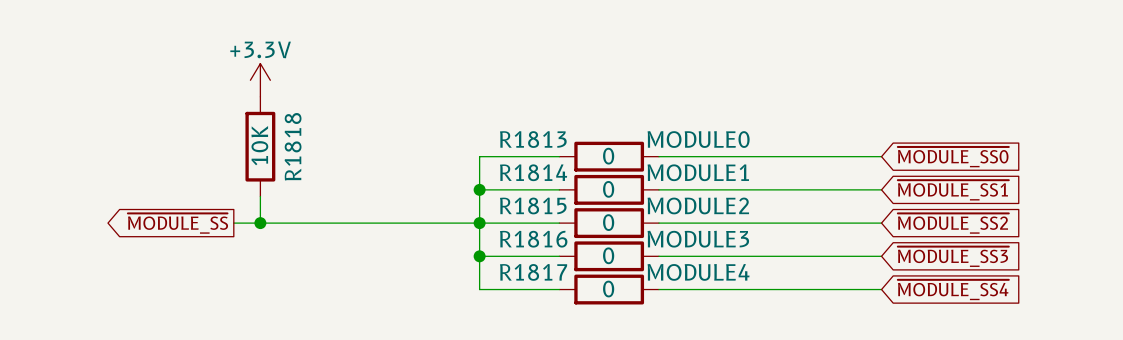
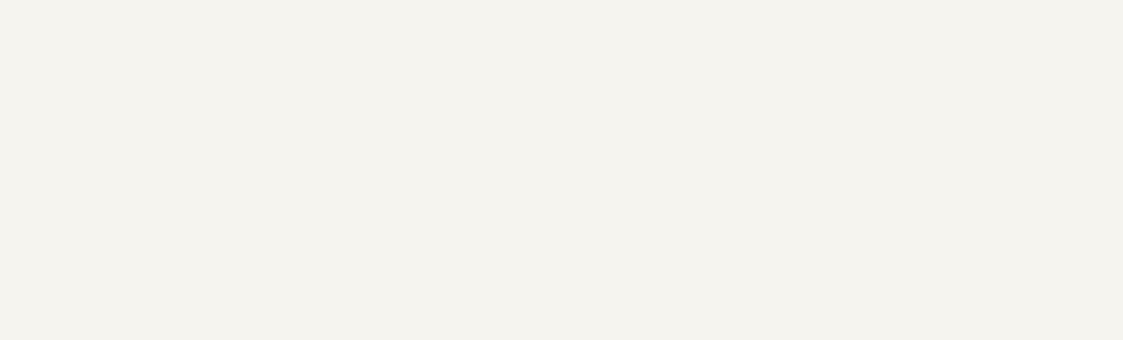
power symbol: +3.3V (260, 80) -> none
R1818: 10K (260, 146) -> none
wire: (559, 156) (479, 156) (479, 289) (559, 289) -> none
R1813: 0 (609, 156) -> none
wire: (659, 156) (881, 156) -> none
global label: ~{MODULE_SS0} (953, 157) -> none
wire: (479, 189) (559, 189) -> none
junction: (479, 189) -> none
R1814: 0 (609, 189) -> none
wire: (659, 189) (881, 189) -> none
global label: ~{MODULE_SS1} (953, 190) -> none
wire: (260, 196) (260, 223) -> none
global label: ~{MODULE_SS} (177, 223) -> none
wire: (233, 223) (559, 223) -> none
junction: (260, 223) -> none
junction: (479, 223) -> none
R1815: 0 (609, 223) -> none
wire: (659, 223) (881, 223) -> none
global label: ~{MODULE_SS2} (953, 223) -> none
wire: (479, 256) (559, 256) -> none
junction: (479, 256) -> none
R1816: 0 (609, 256) -> none
wire: (659, 256) (881, 256) -> none
global label: ~{MODULE_SS3} (953, 256) -> none
R1817: 0 (609, 289) -> none
wire: (659, 289) (881, 289) -> none
global label: ~{MODULE_SS4} (953, 289) -> none

